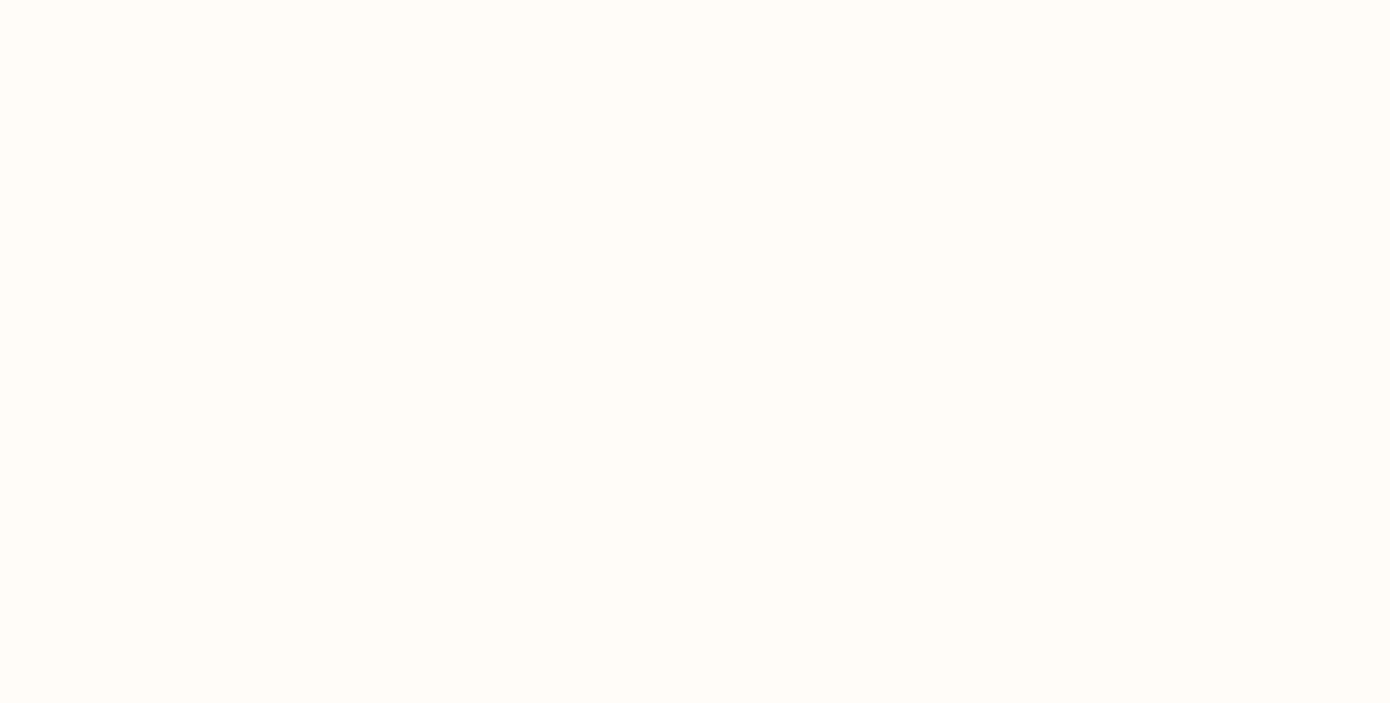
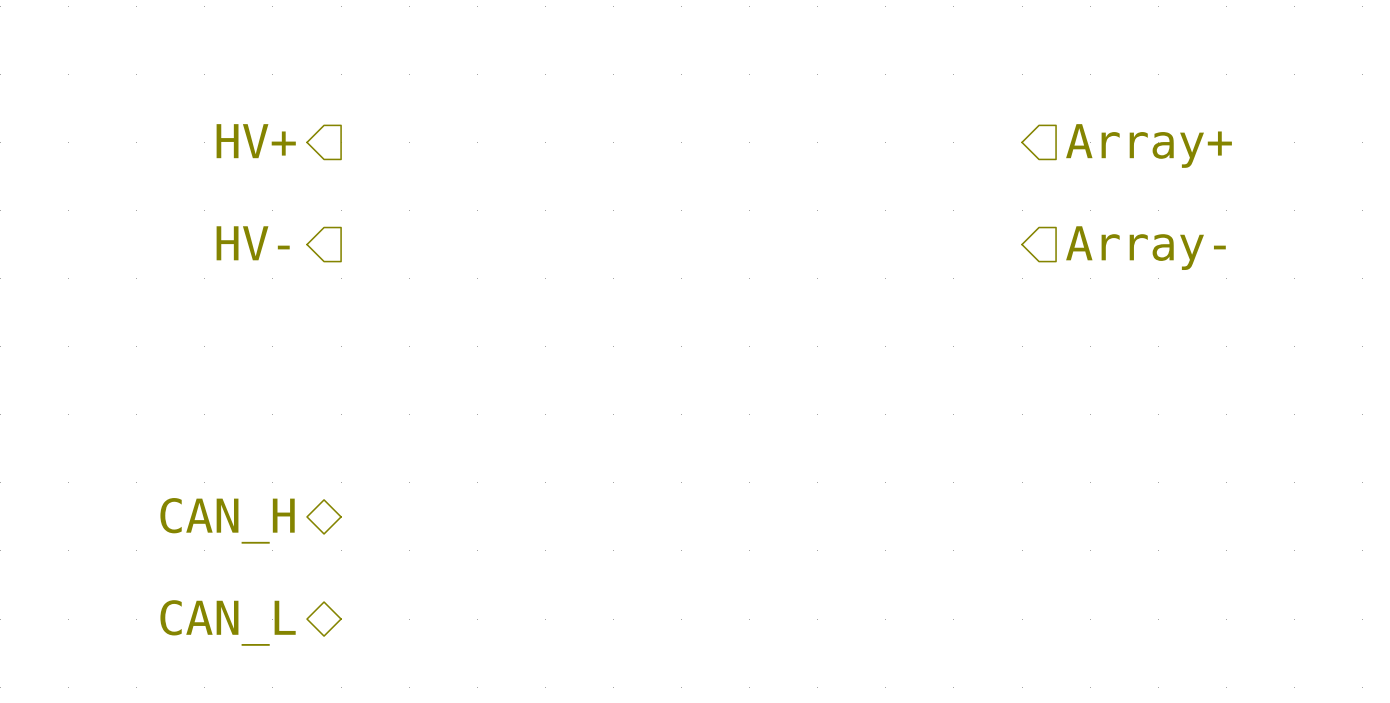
hierarchical label: none -> HV+ (256, 141)
hierarchical label: none -> Array+ (1149, 146)
hierarchical label: none -> HV- (253, 243)
hierarchical label: none -> Array- (1145, 248)
hierarchical label: none -> CAN_H (227, 520)
hierarchical label: none -> CAN_L (228, 622)

